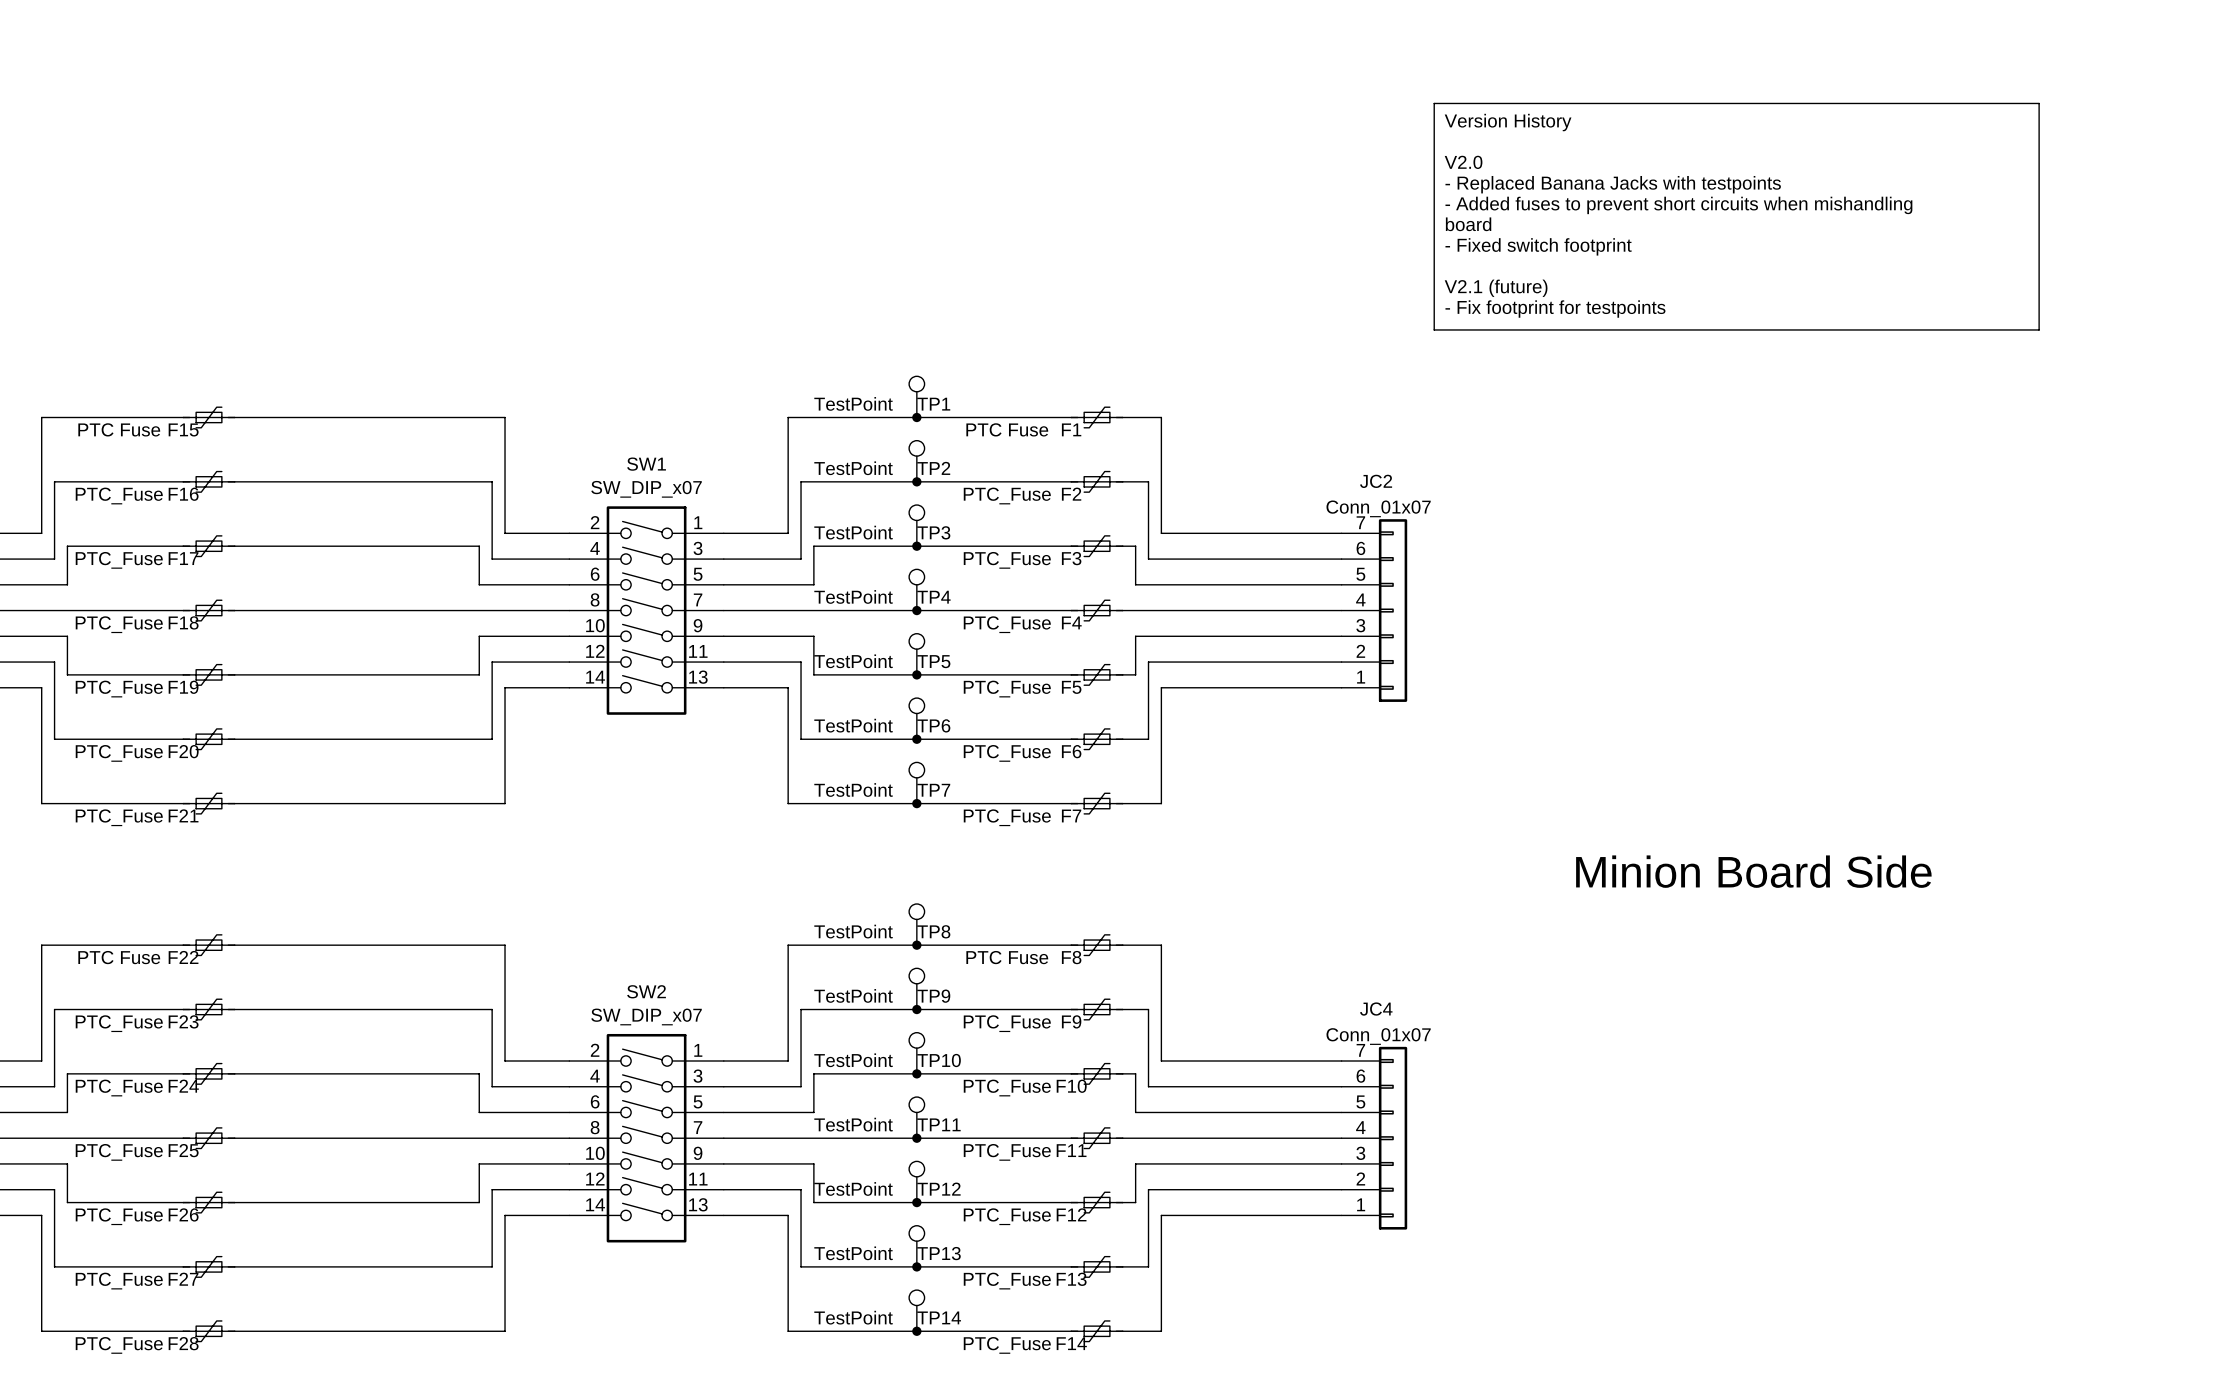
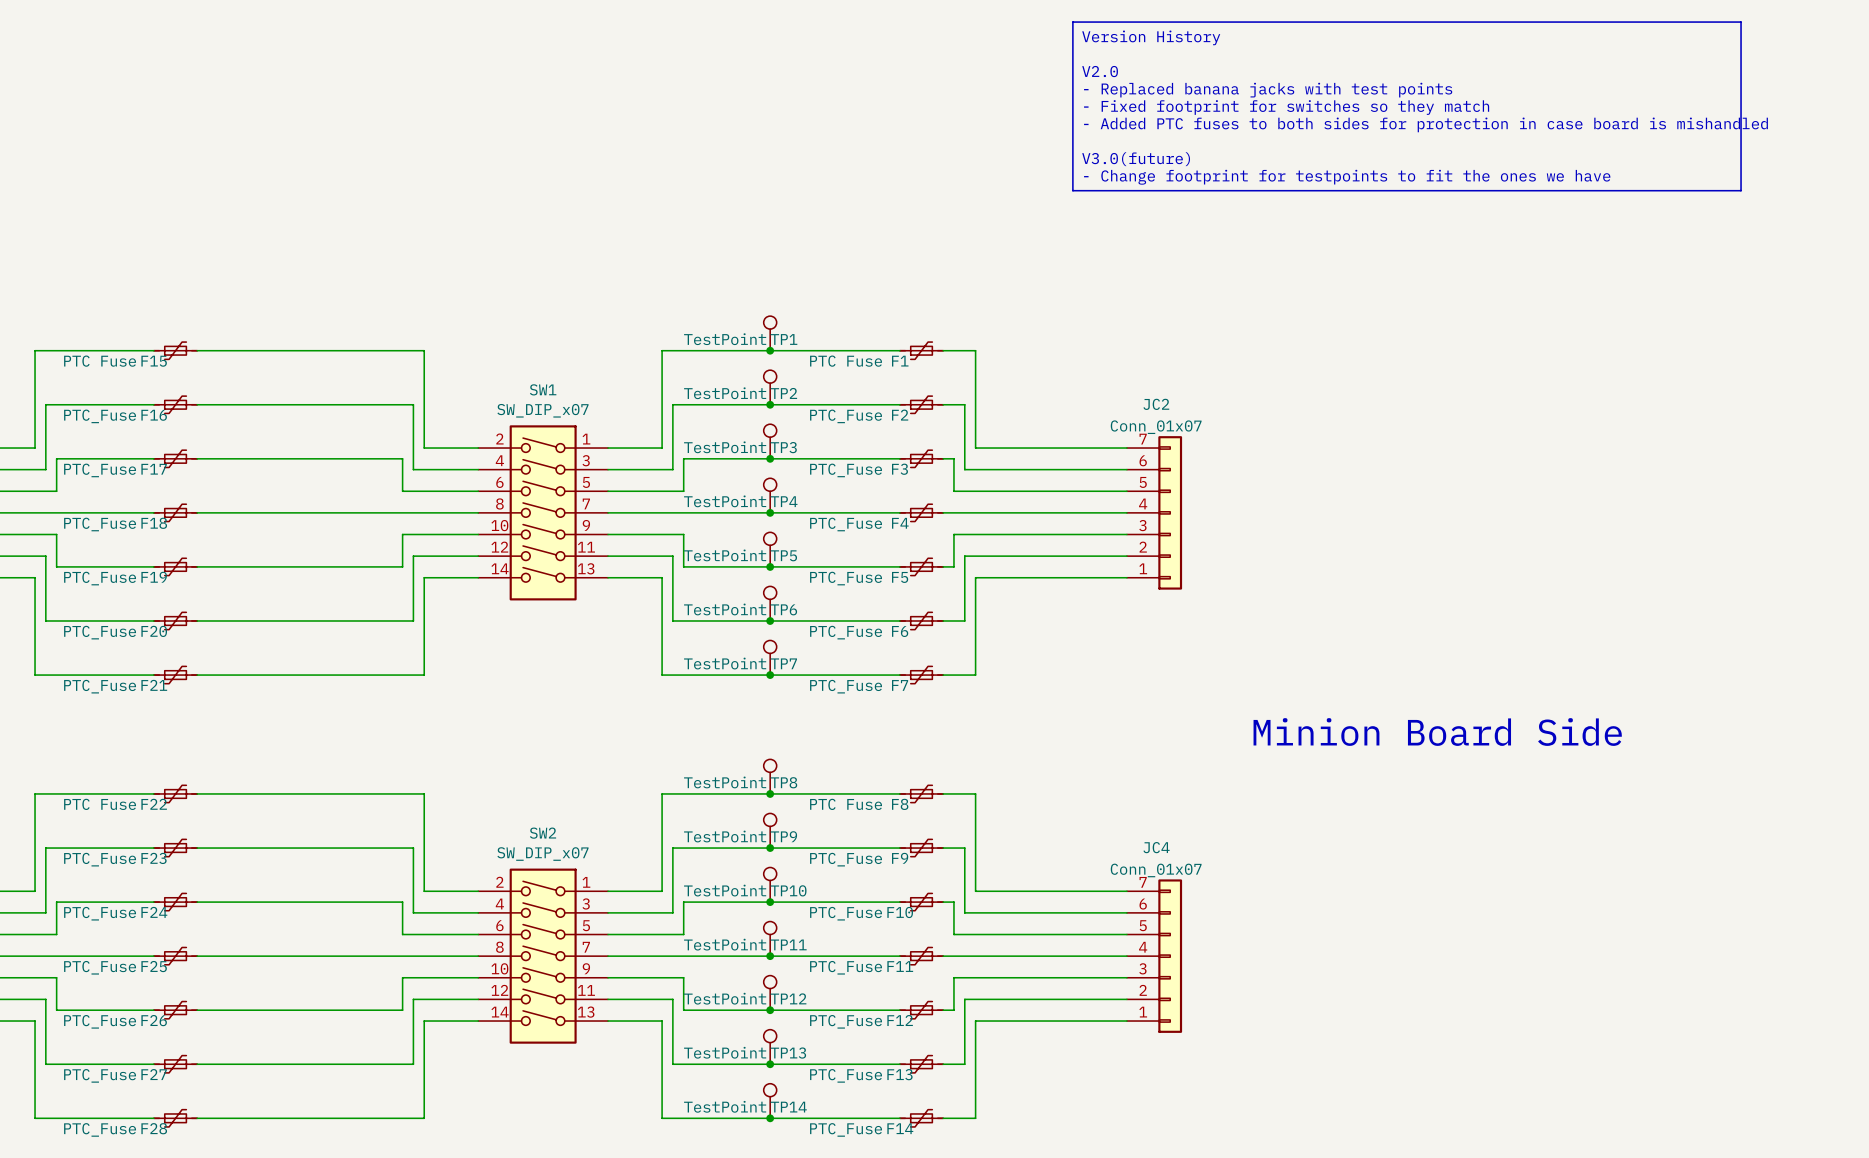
line: none -> (1072, 22) (1741, 22) (1741, 190) (1072, 190) (1072, 22)
line: (1434, 103) (2039, 103) (2039, 329) (1434, 329) (1434, 103) -> none
text: none -> - Replaced banana jacks with test points (1268, 90)
text position: Version History (1508, 122) -> Version History (1151, 37)
text: none -> - Fixed footprint for switches so they match (1286, 107)
text: none -> - Added PTC fuses to both sides for protection in case board is mishandled (1425, 124)
text position: V2.0 (1463, 162) -> V2.0 (1100, 71)
text: - Replaced Banana Jacks with testpoints (1613, 184) -> none
text: none -> V3.0(future) (1136, 159)
text: - Added fuses to prevent short circuits when mishandling (1678, 205) -> none
text: none -> - Change footprint for testpoints to fit the ones we have (1347, 177)
text: board (1468, 224) -> none
text: - Fixed switch footprint (1538, 246) -> none
text: V2.1 (future) (1496, 288) -> none
text: - Fix footprint for testpoints (1555, 309) -> none

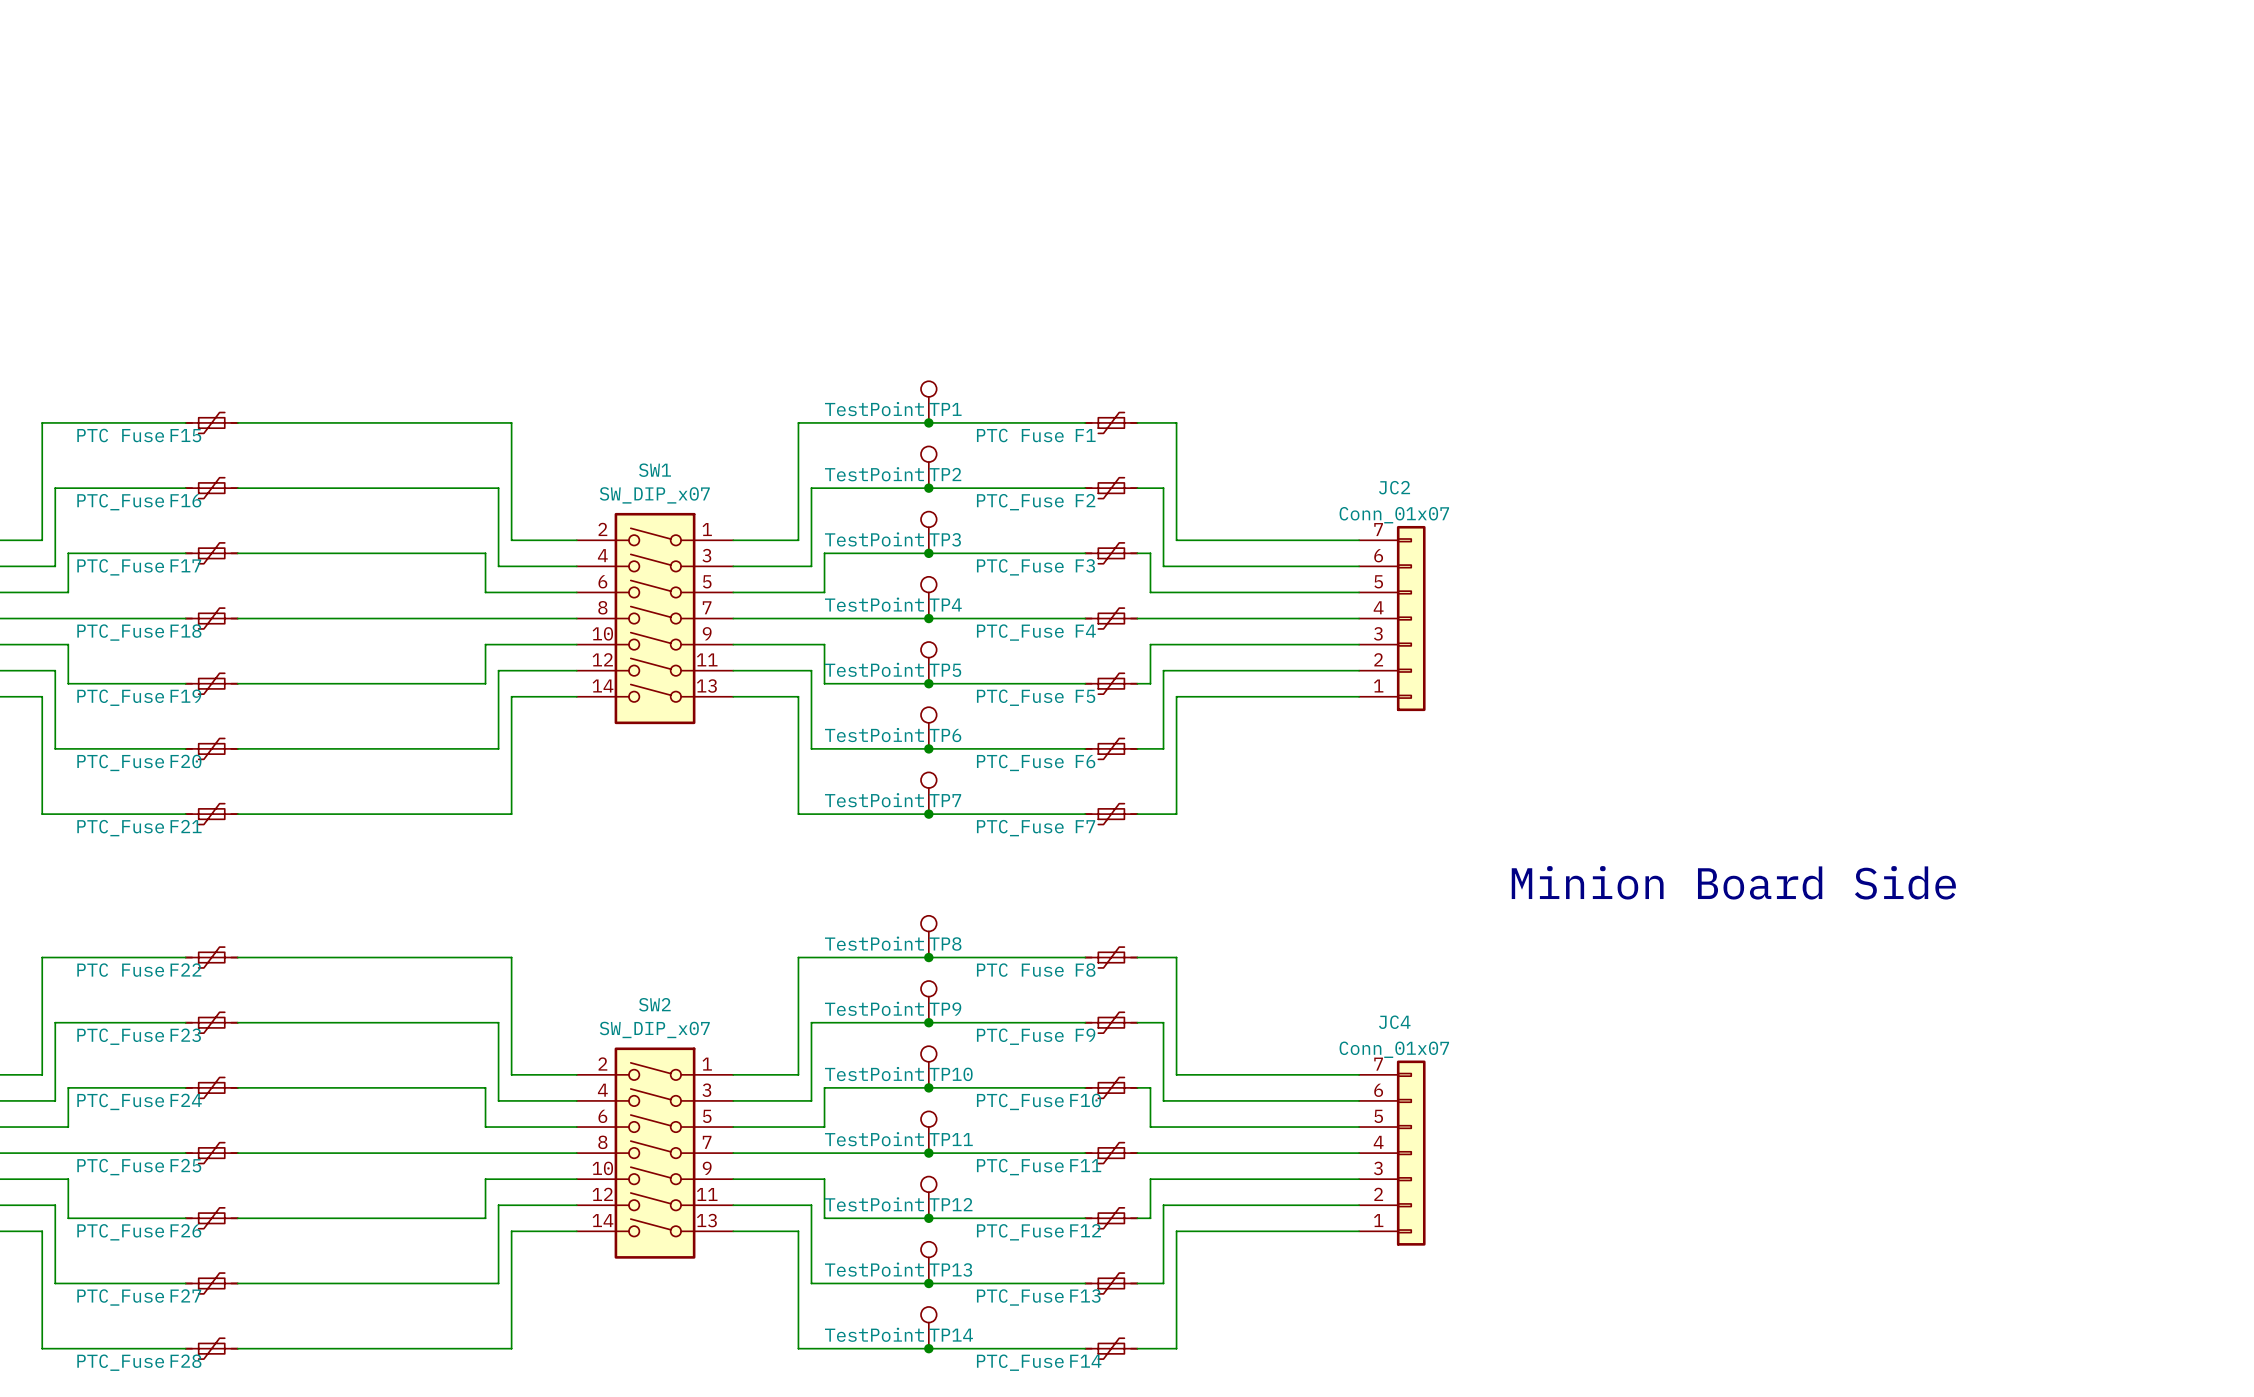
line: (1072, 22) (1741, 22) (1741, 190) (1072, 190) (1072, 22) -> none
text: Version History (1151, 37) -> none
text: V2.0 (1100, 71) -> none
text: - Replaced banana jacks with test points (1268, 90) -> none
text: - Fixed footprint for switches so they match (1286, 107) -> none
text: - Added PTC fuses to both sides for protection in case board is mishandled (1425, 124) -> none
text: V3.0(future) (1136, 159) -> none
text: - Change footprint for testpoints to fit the ones we have (1347, 177) -> none

